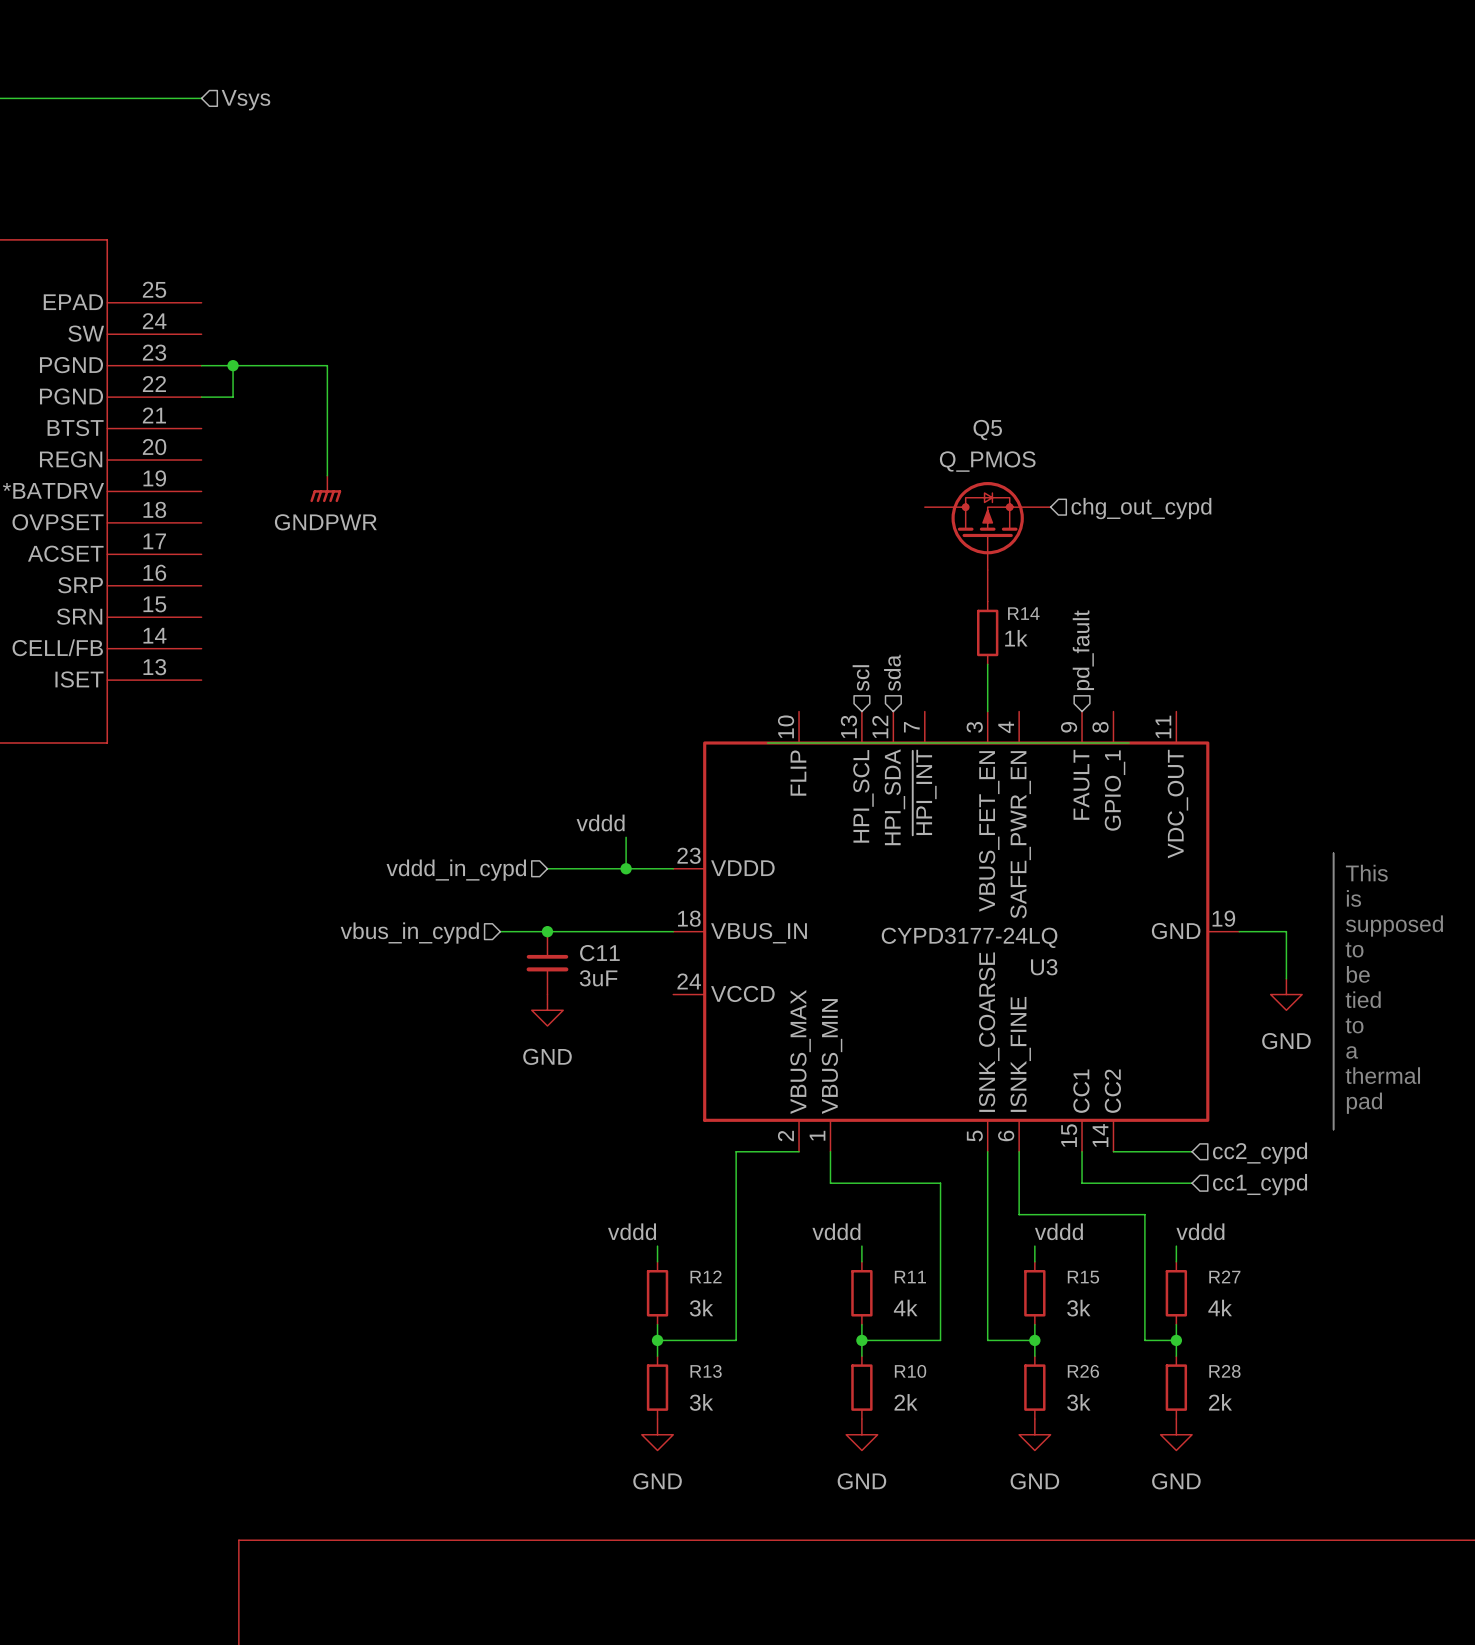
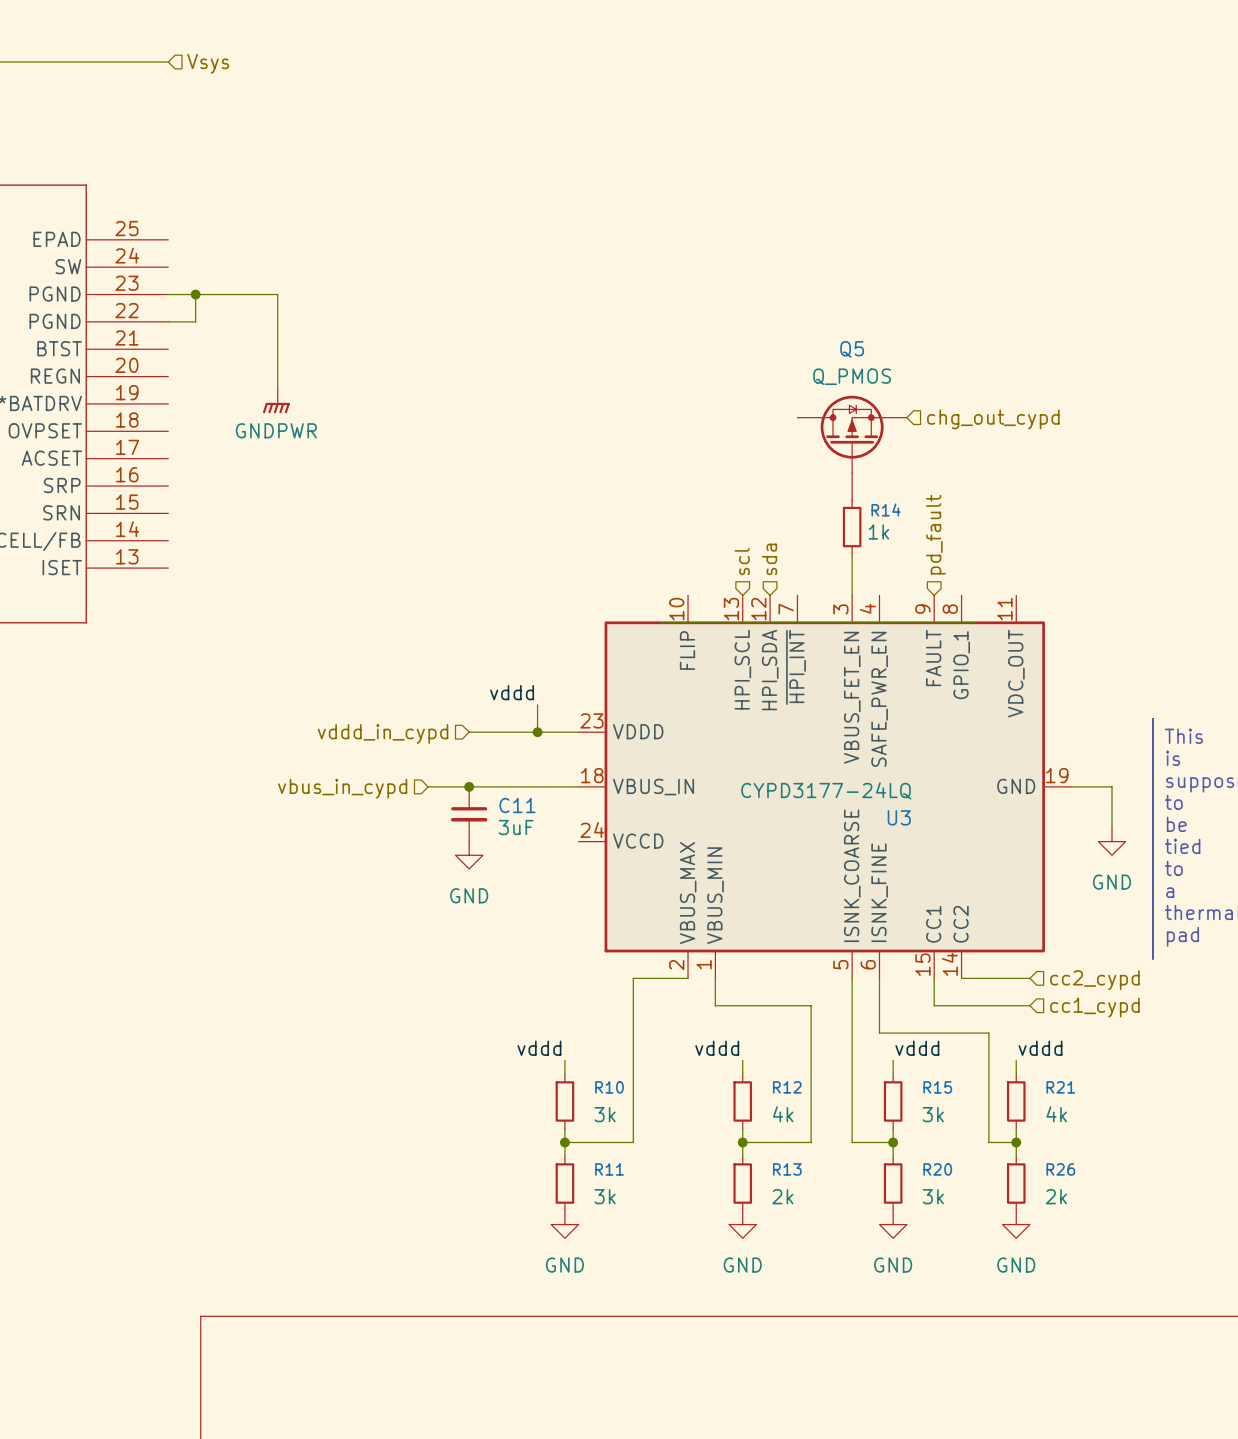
R12 name: R12 (706, 1276) -> R10 (609, 1087)
R27 name: R27 (1224, 1276) -> R21 (1060, 1087)
R11 name: R11 (910, 1277) -> R12 (787, 1087)
R13 name: R13 (706, 1371) -> R11 (609, 1169)
R10 name: R10 (910, 1371) -> R13 (787, 1169)
R26 name: R26 (1083, 1371) -> R20 (937, 1169)
R28 name: R28 (1224, 1371) -> R26 (1060, 1169)

